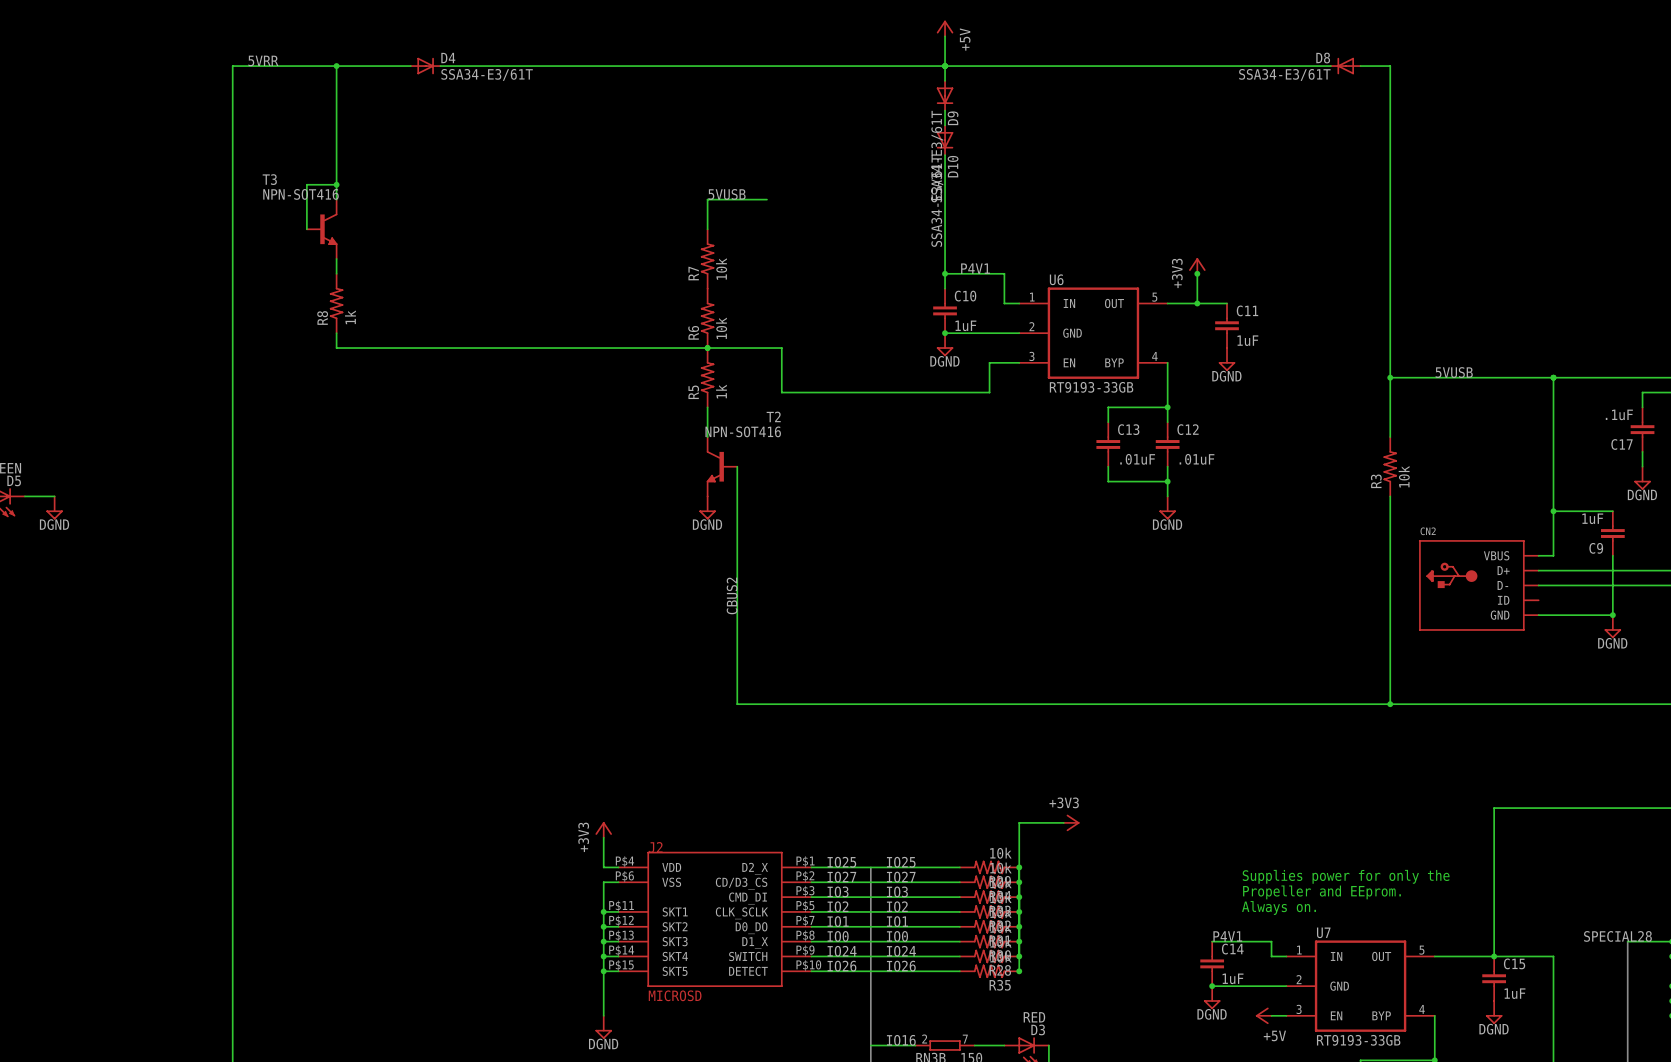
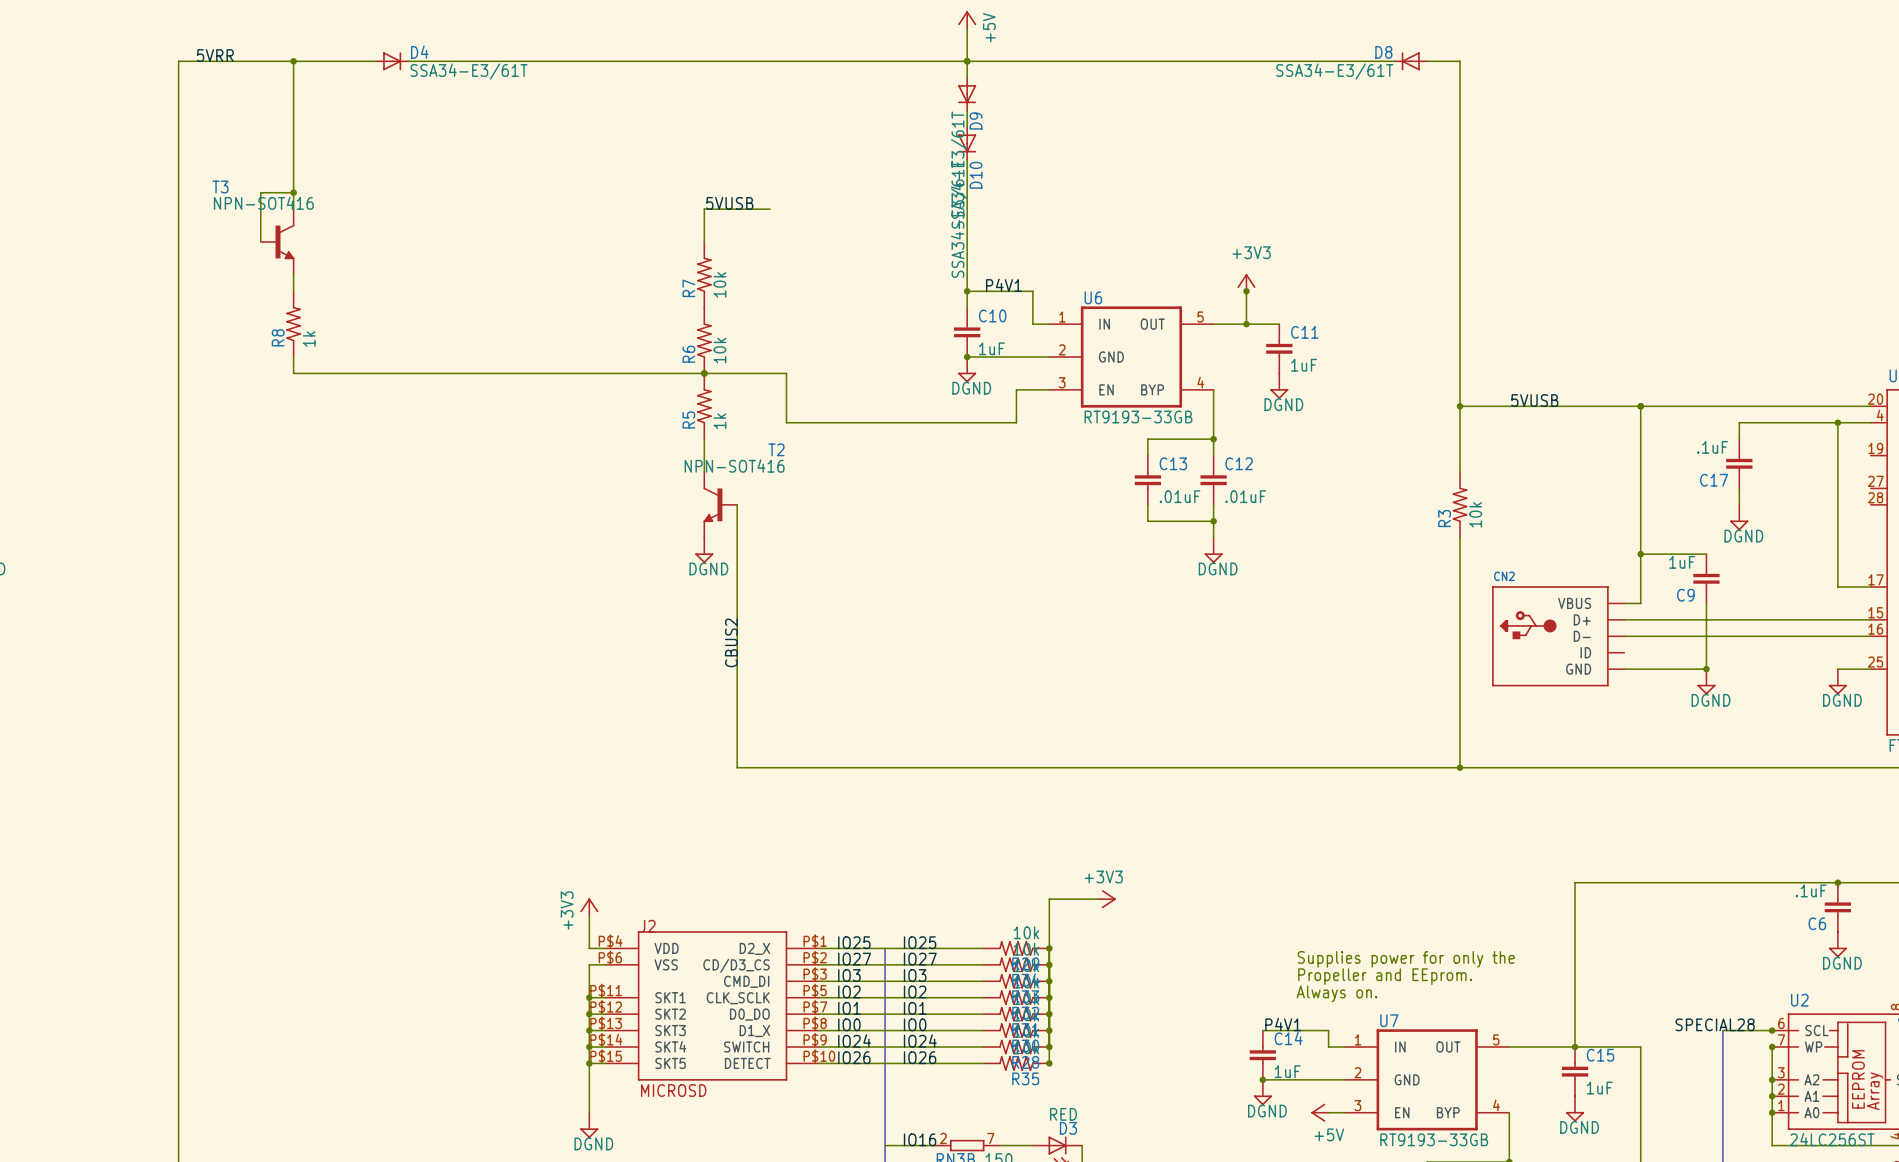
power symbol text rotation: 0° (1177, 273) -> 90° clockwise (1251, 252)

